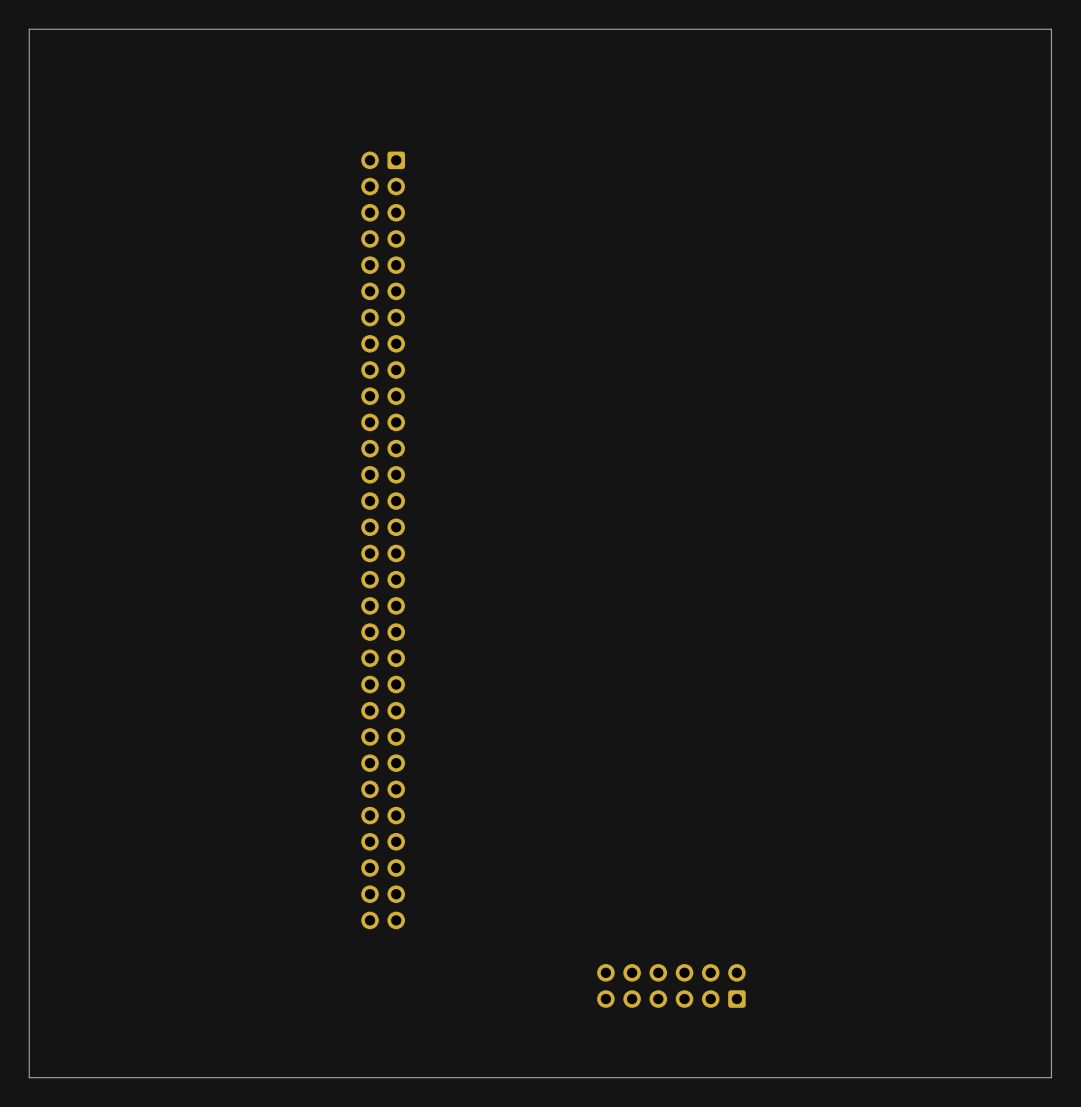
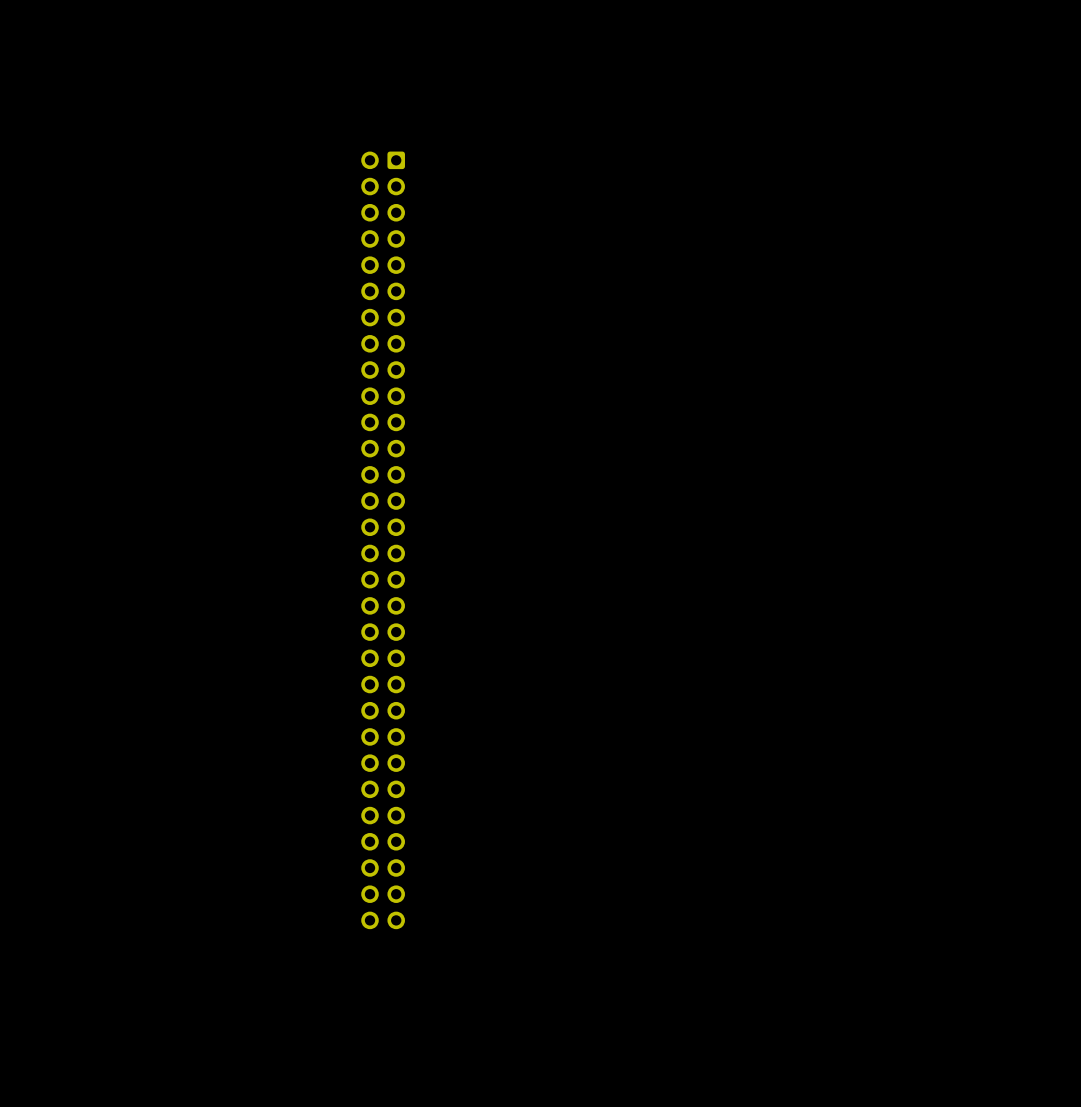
board edge: (1051, 29) (29, 29) (29, 1077) (1051, 1077) (1051, 29) -> none
part: (671, 985) -> none

